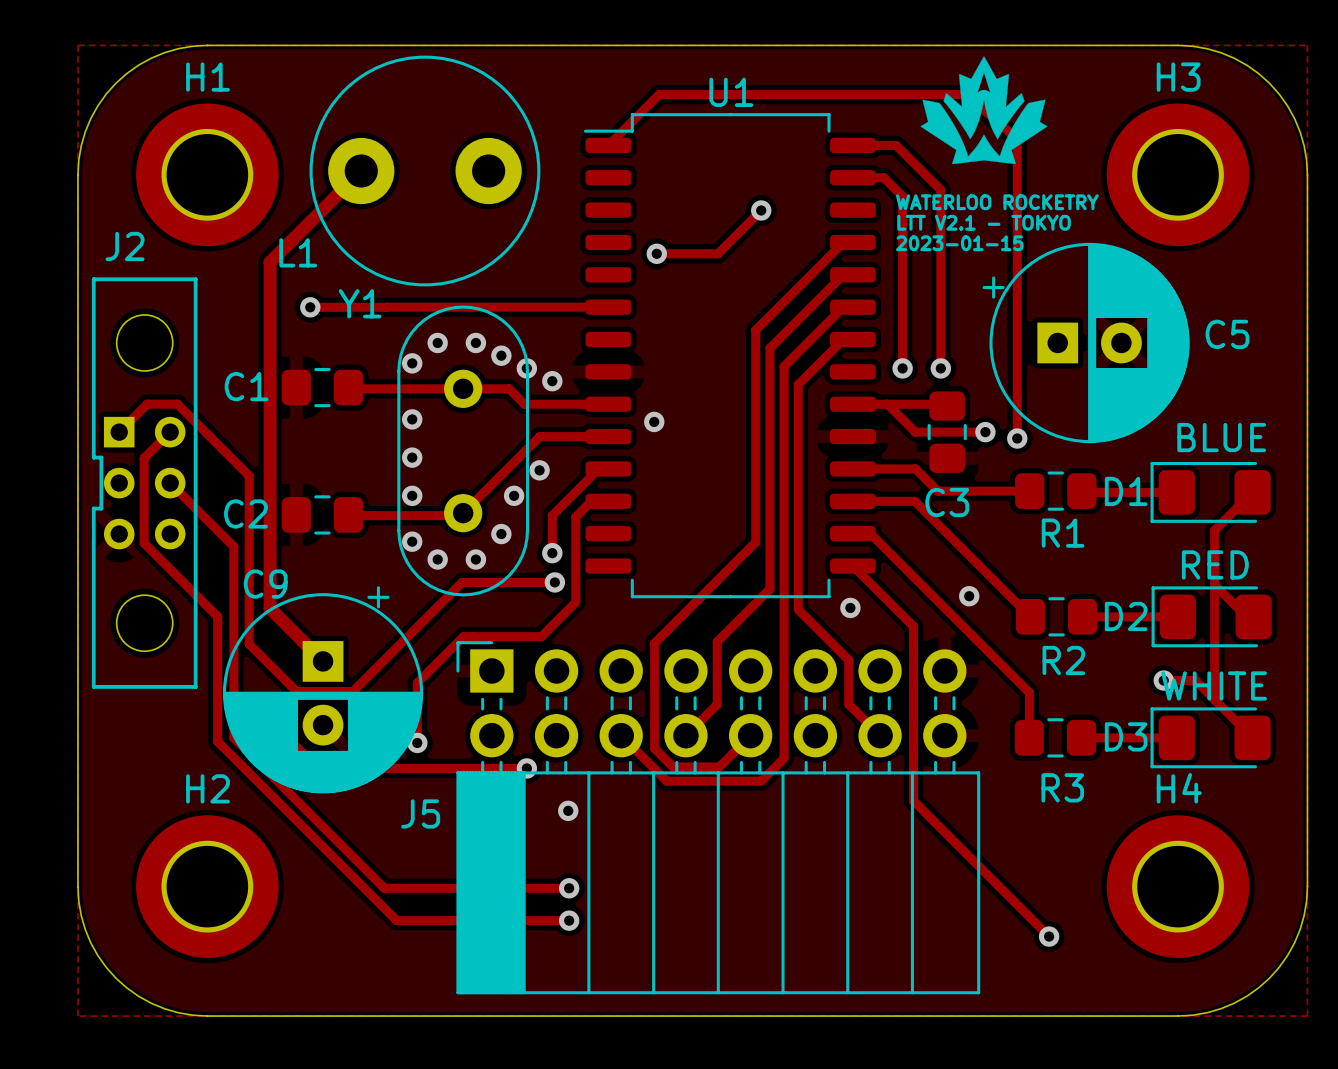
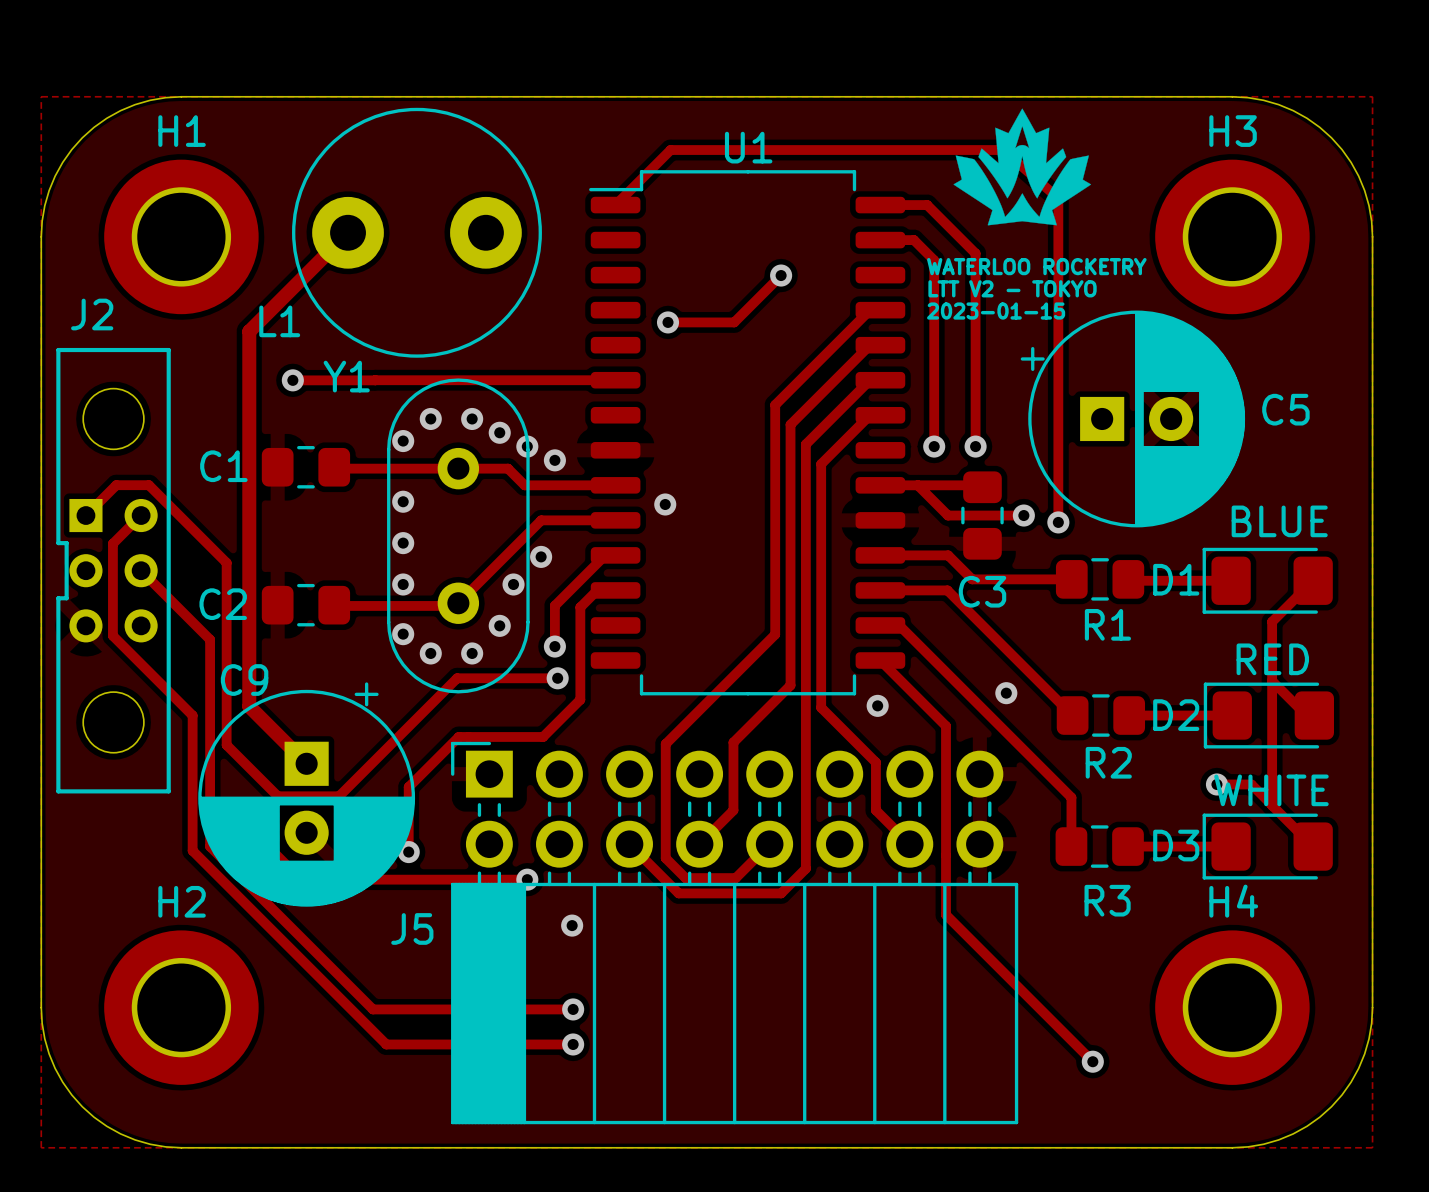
text: LTT V2.1 - TOKYO (984, 222) -> LTT V2 - TOKYO (1012, 288)

